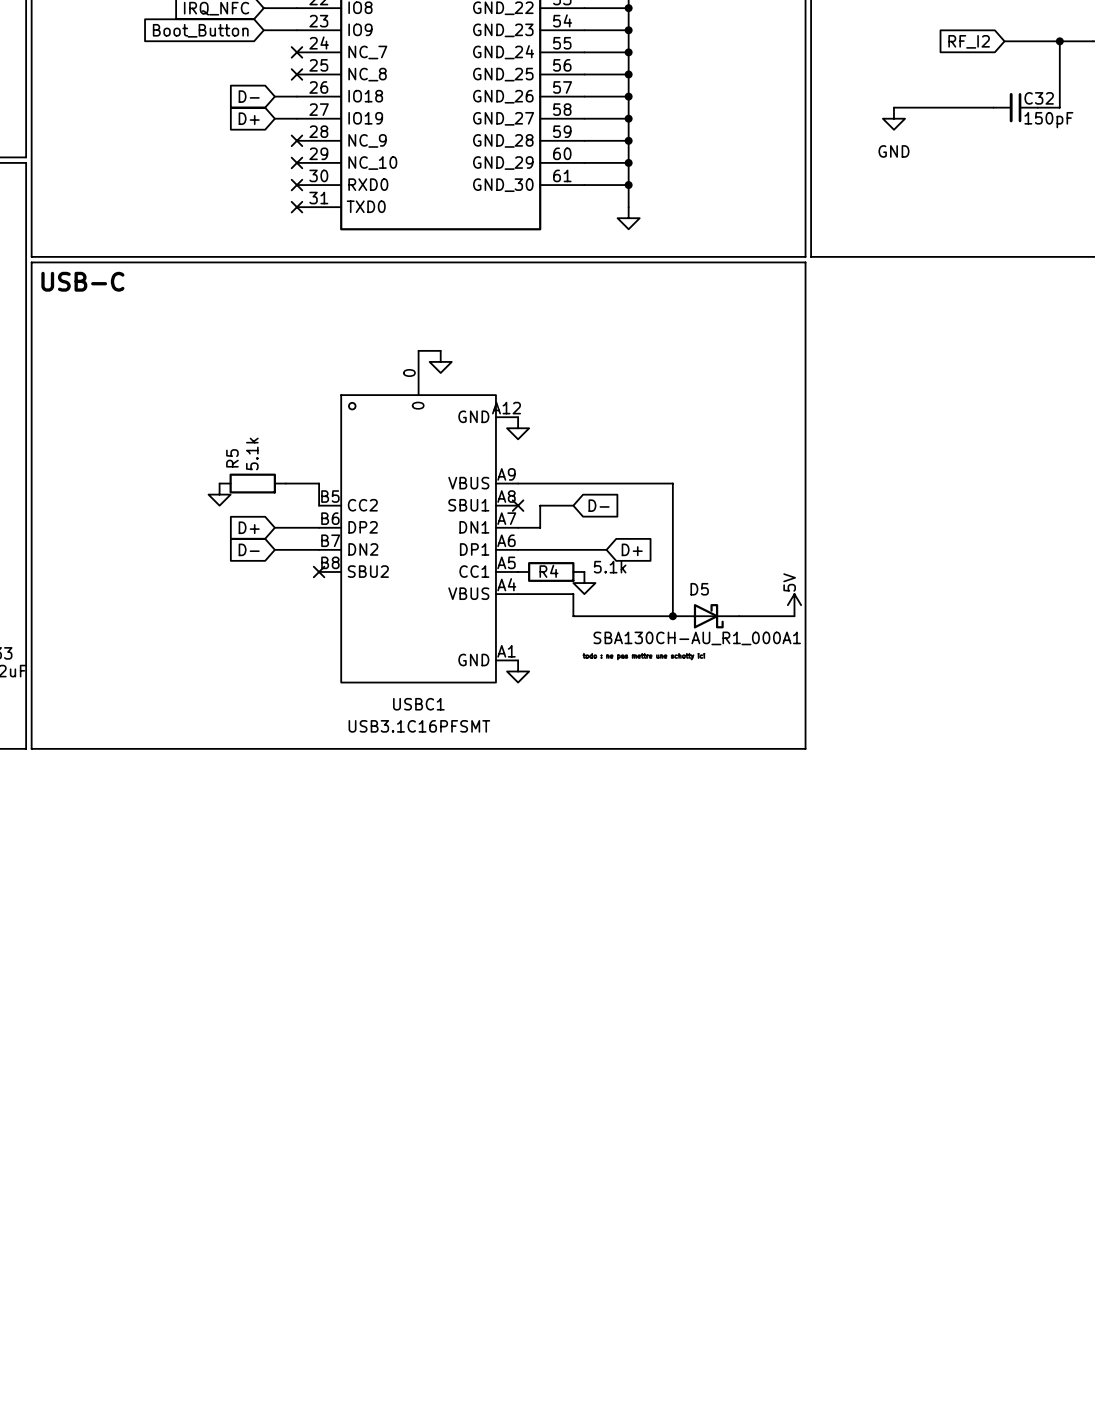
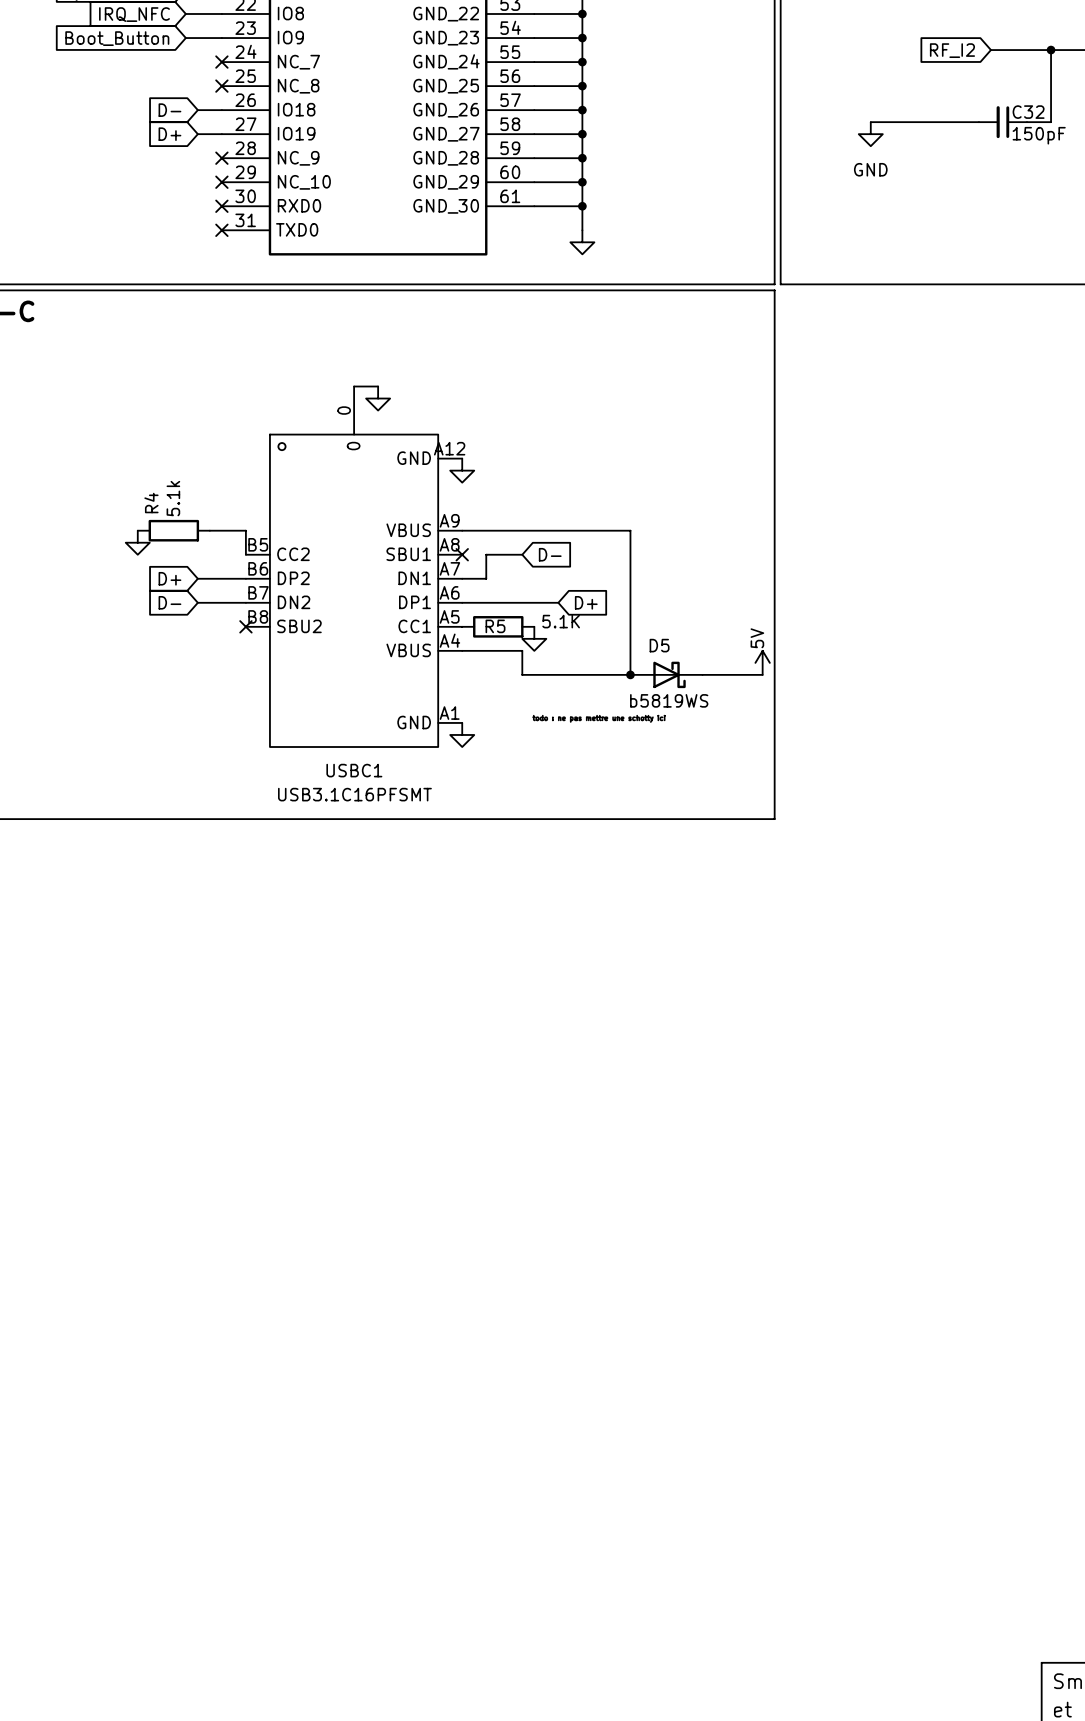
R5 name: R5 (232, 458) -> R4 (151, 503)
R4 value: 5.1k (610, 567) -> 5.1K (561, 621)
R4 name: R4 (548, 571) -> R5 (495, 626)
D5 value: SBA130CH-AU_R1_000A1 (697, 638) -> b5819WS (669, 700)

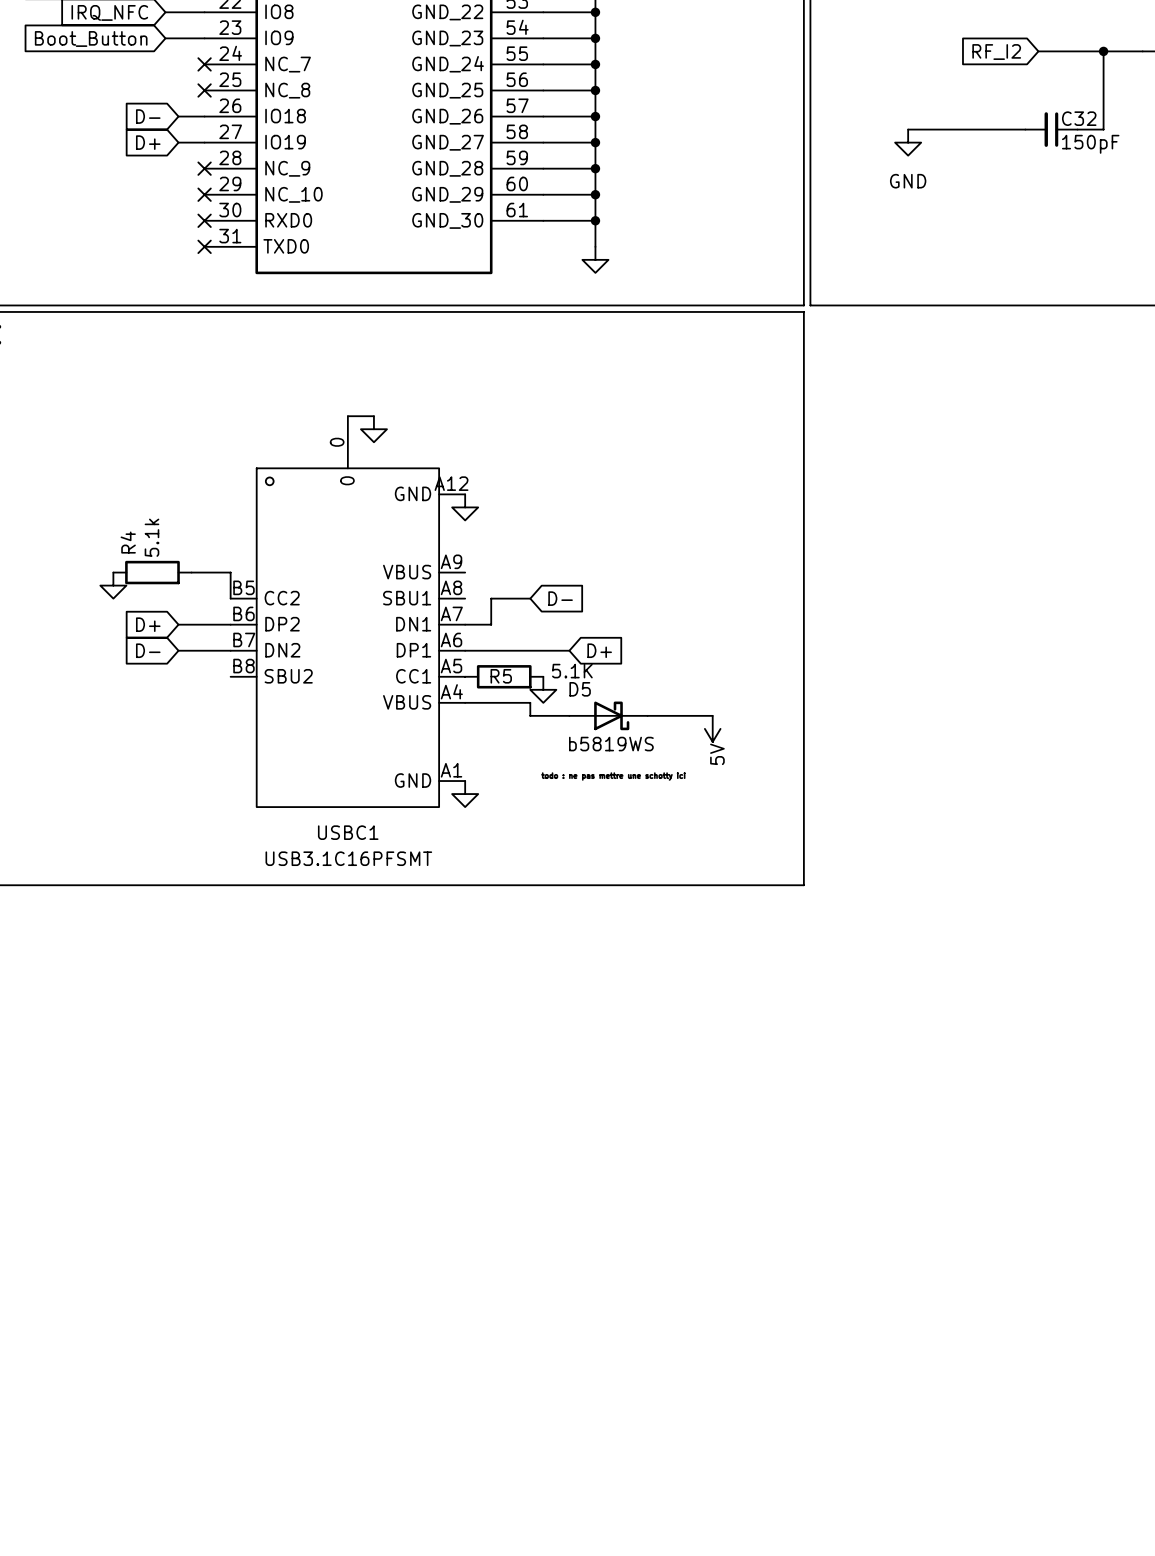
wire: (462, 530) (630, 530) (630, 674) (522, 674) (522, 662) -> (569, 715) (530, 715)
no-connect mark: (462, 554) -> none
no-connect mark: (245, 626) -> none
D5 name position: D5 (659, 645) -> D5 (580, 689)
power symbol rotation: 0° (762, 662) -> 180° (712, 728)
power symbol position: 5V (762, 662) -> 5V (712, 728)
junction: (630, 674) -> none
D5 position: (666, 674) -> (608, 715)
wire: (702, 674) (762, 674) -> (647, 715) (712, 715)

